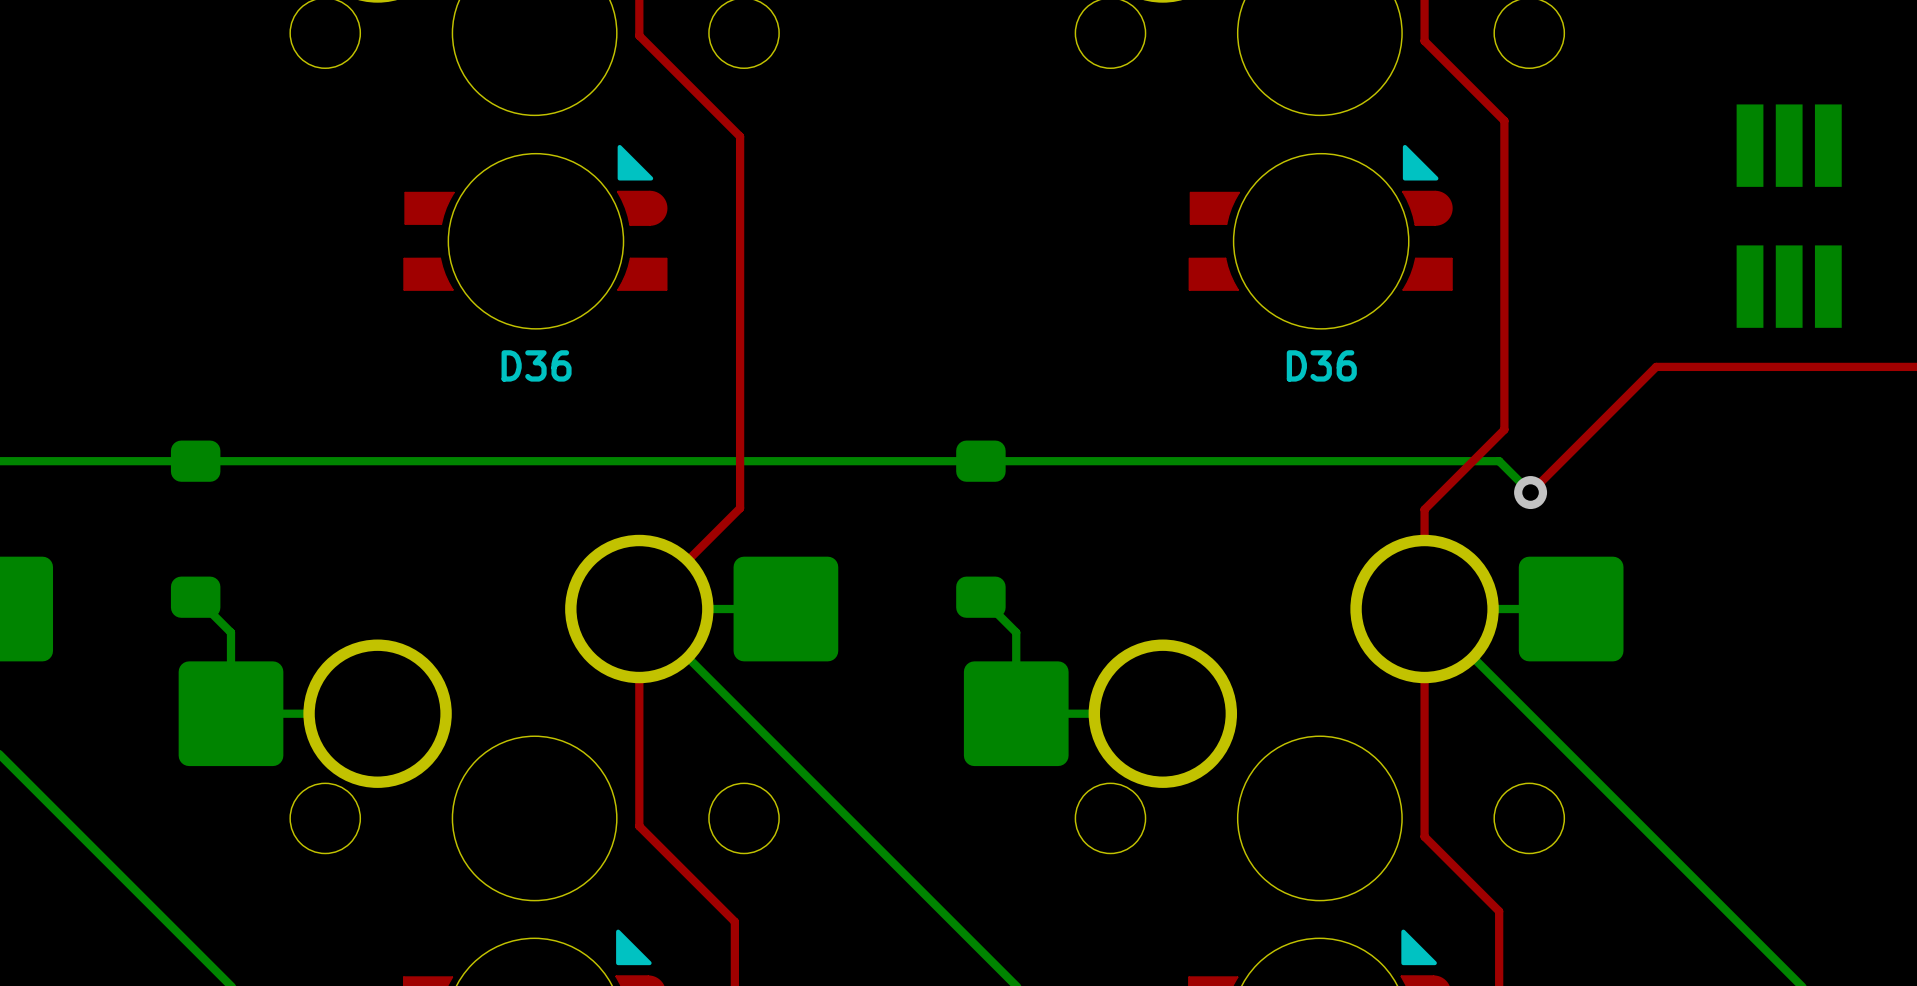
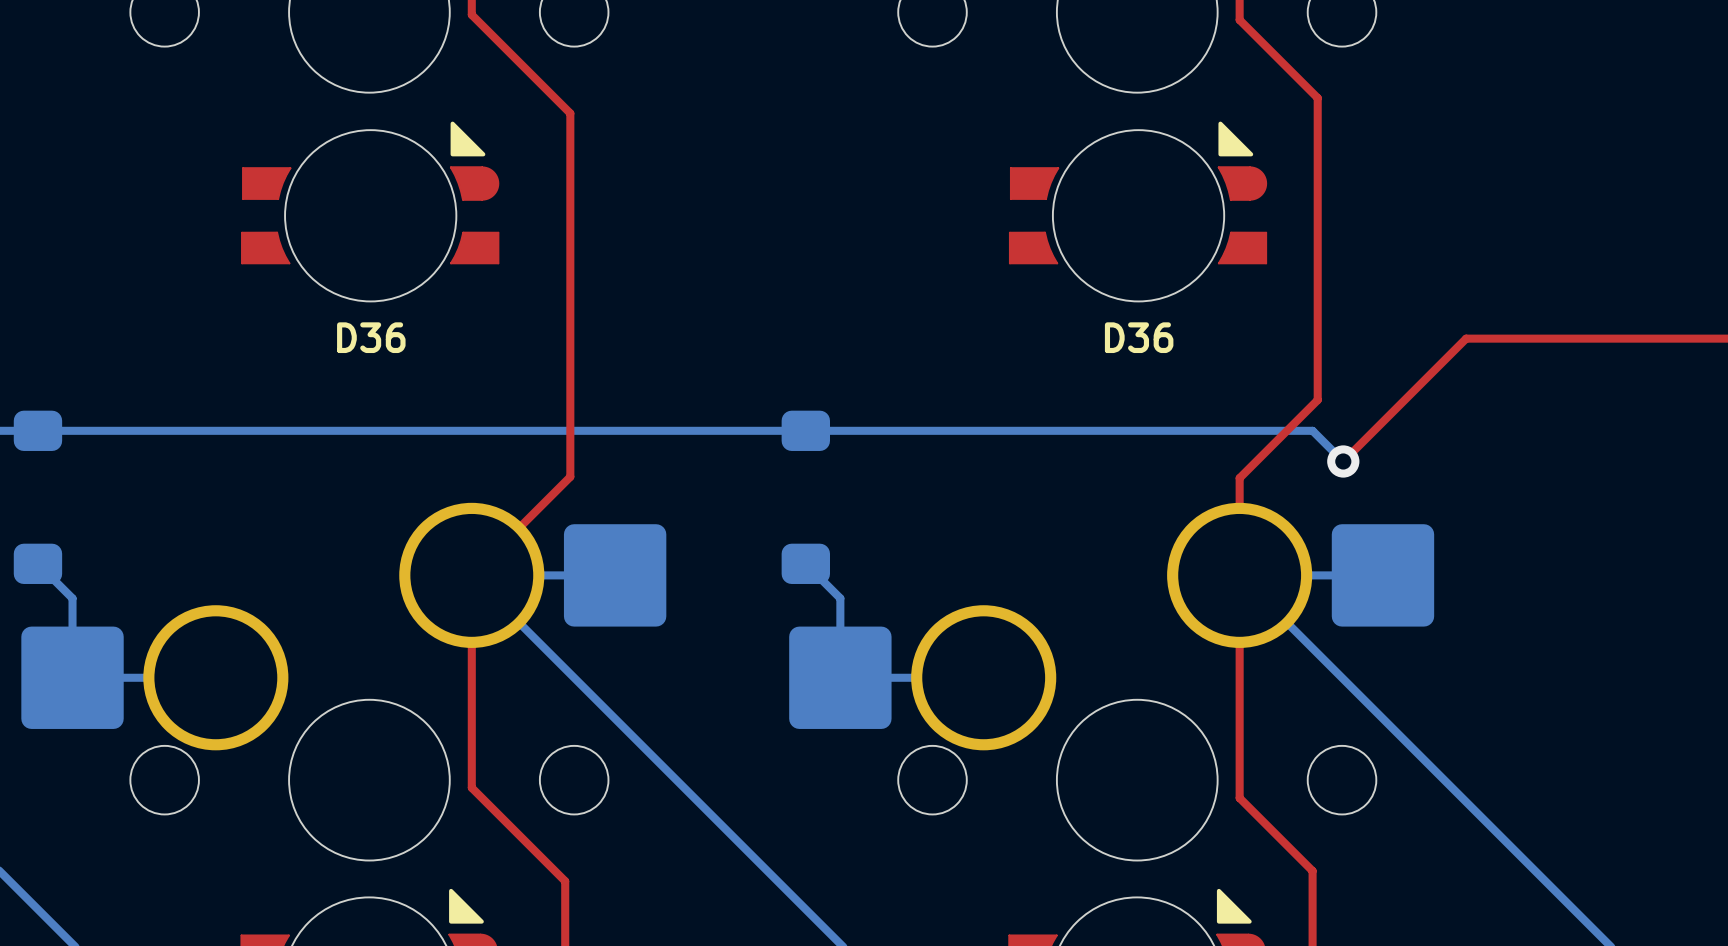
part: (1789, 216) -> none

